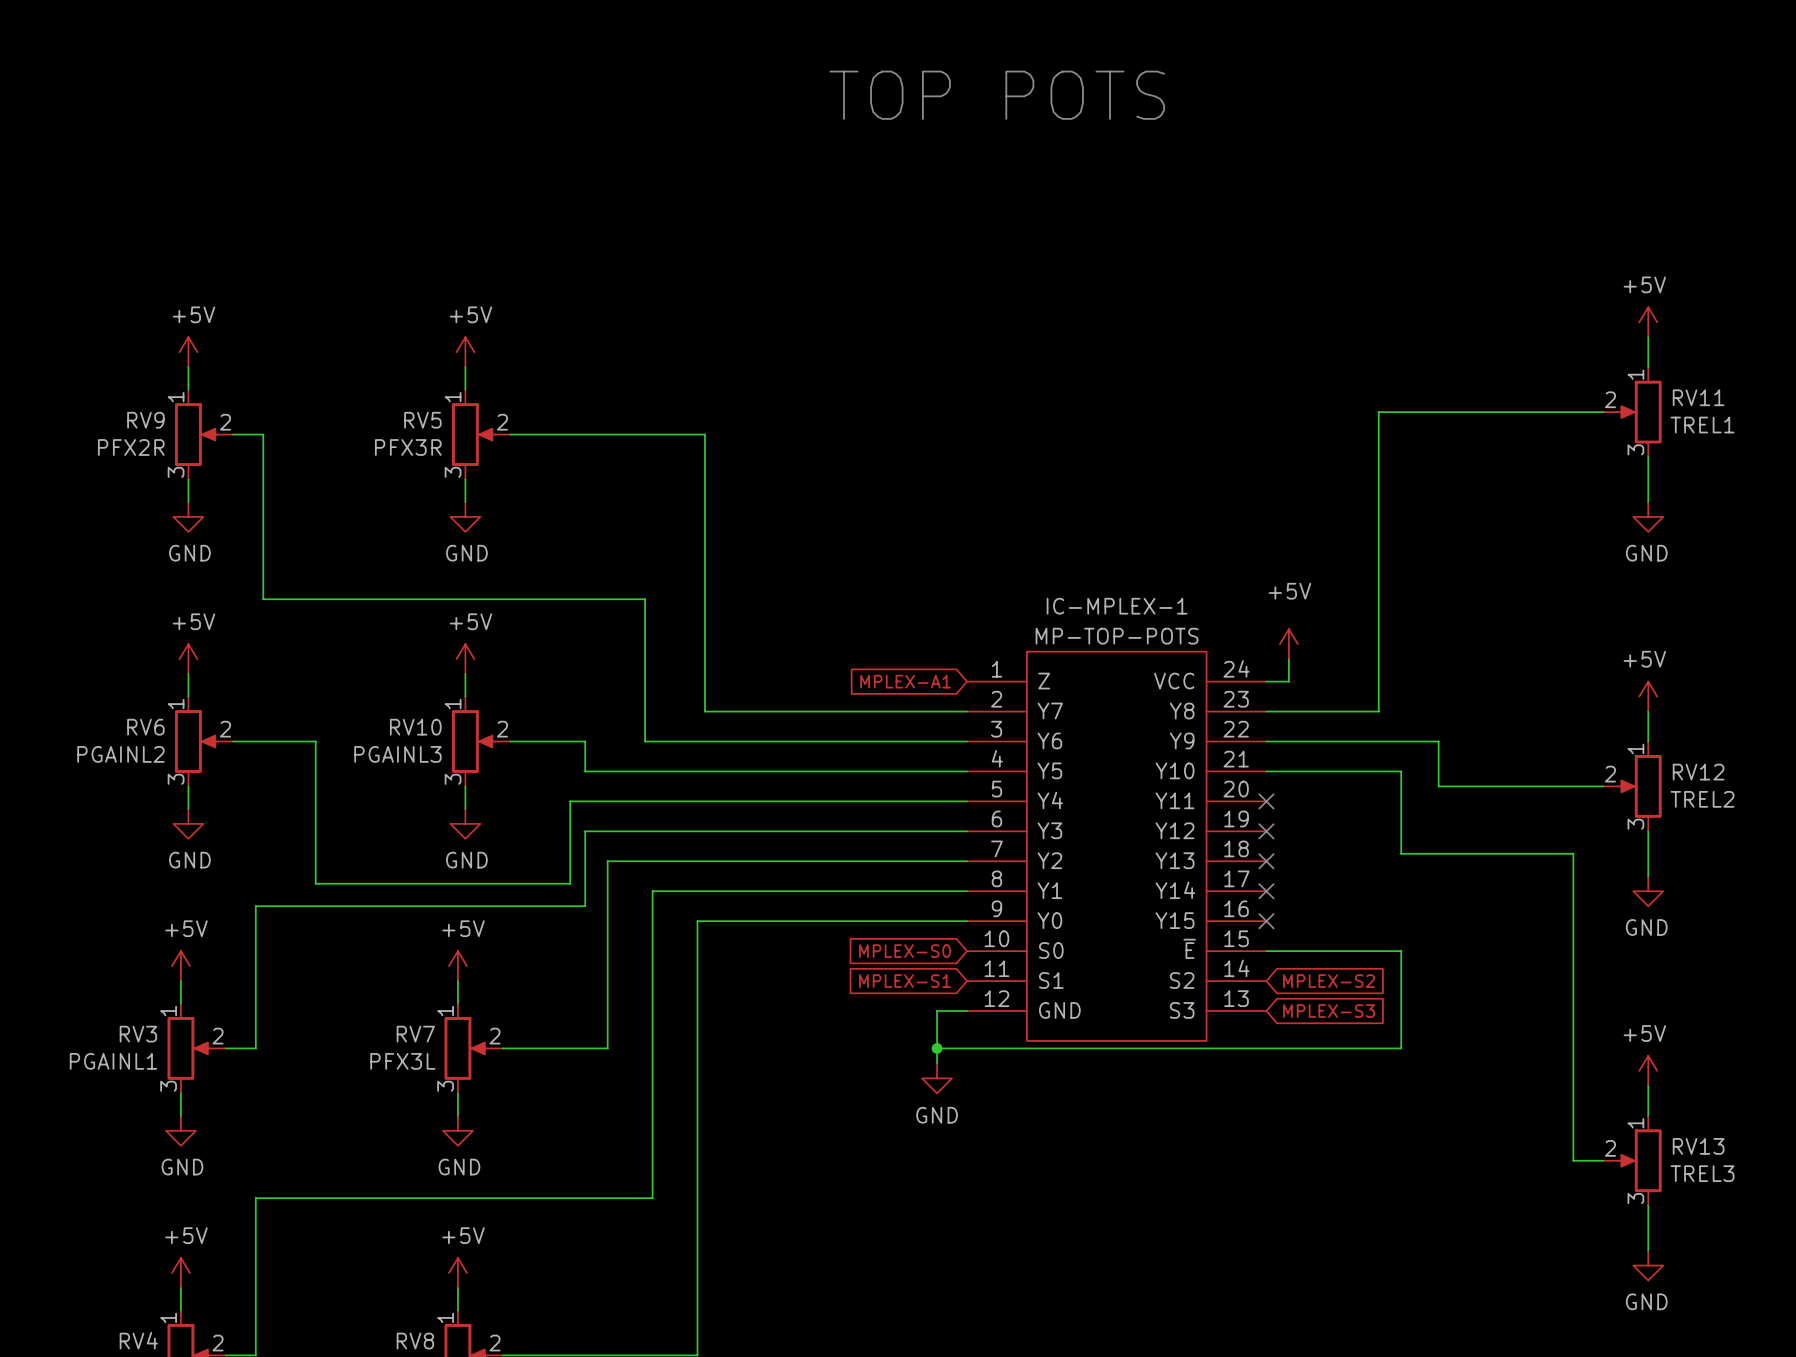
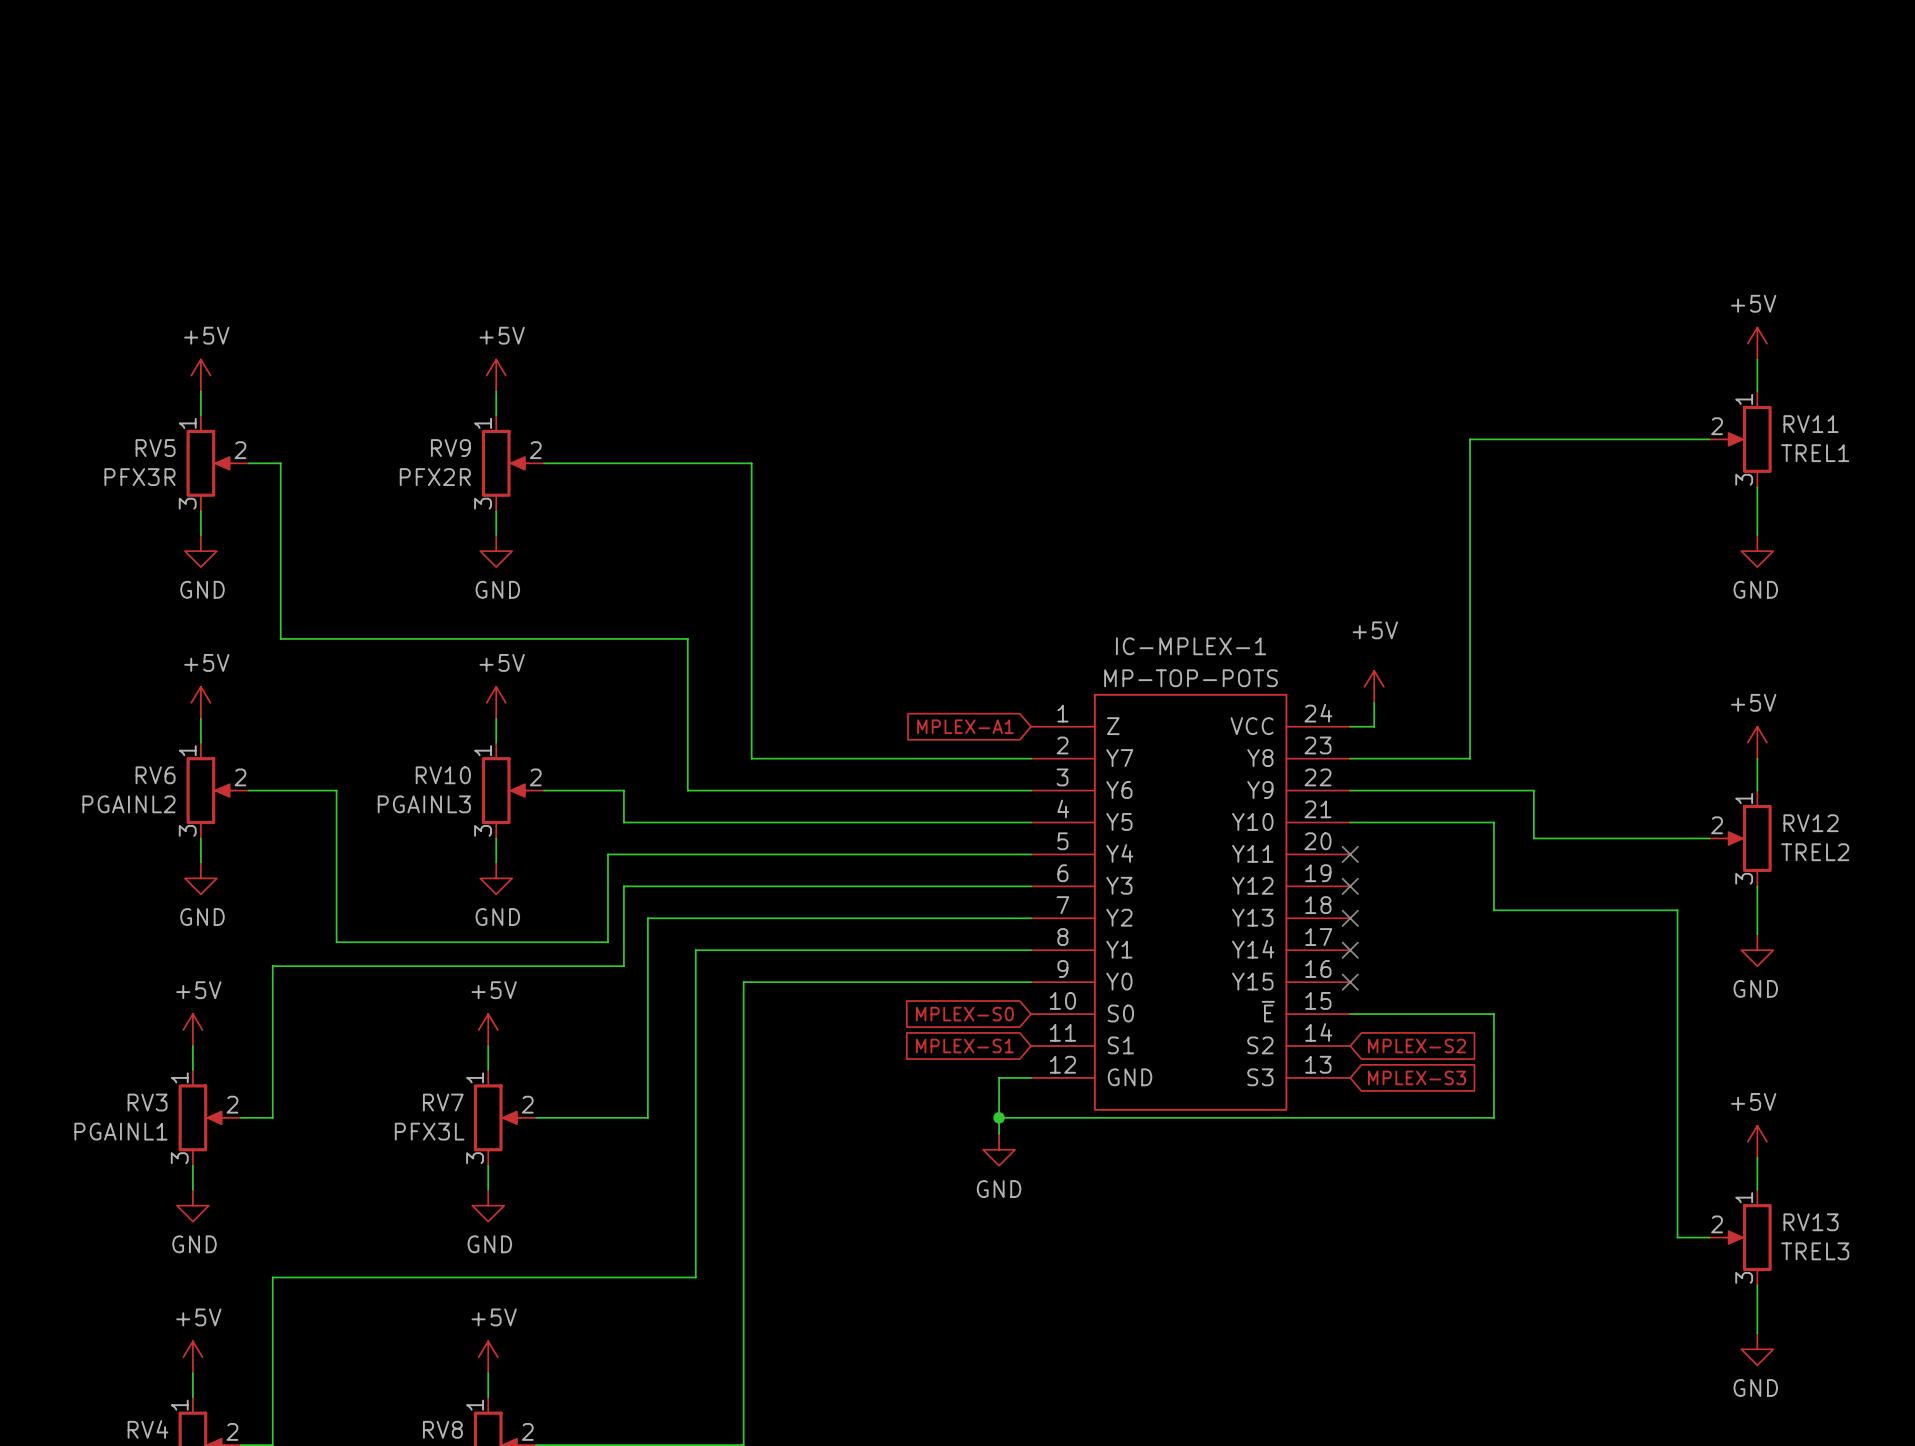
text: TOP POTS (997, 95) -> none
RV9 name: RV9 (145, 420) -> RV5 (155, 448)
RV5 name: RV5 (422, 420) -> RV9 (450, 448)
RV9 value: PFX2R (131, 447) -> PFX3R (139, 477)
RV5 value: PFX3R (408, 447) -> PFX2R (435, 477)

